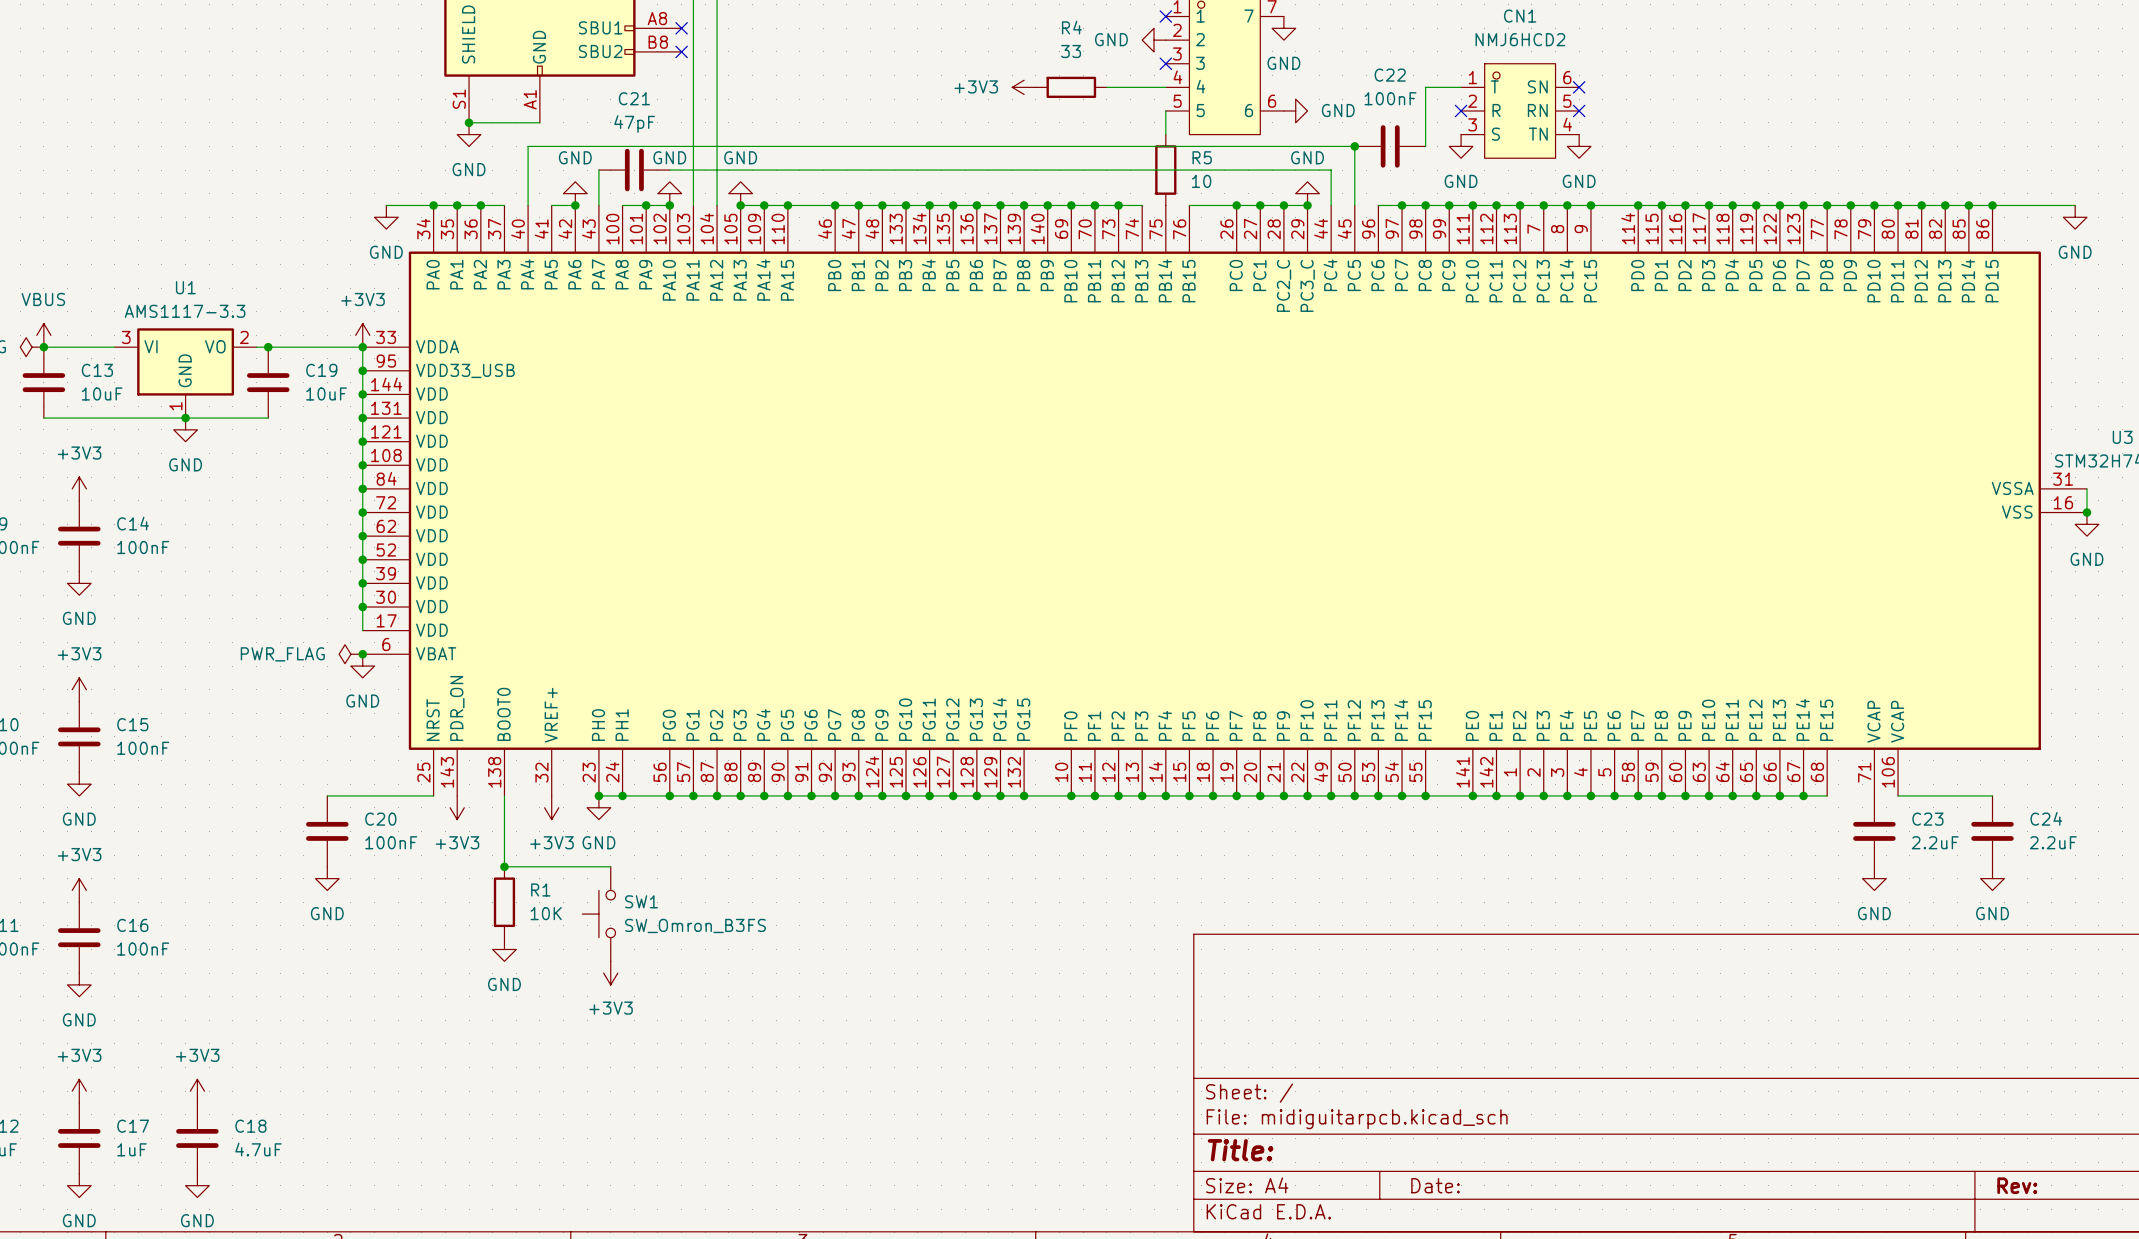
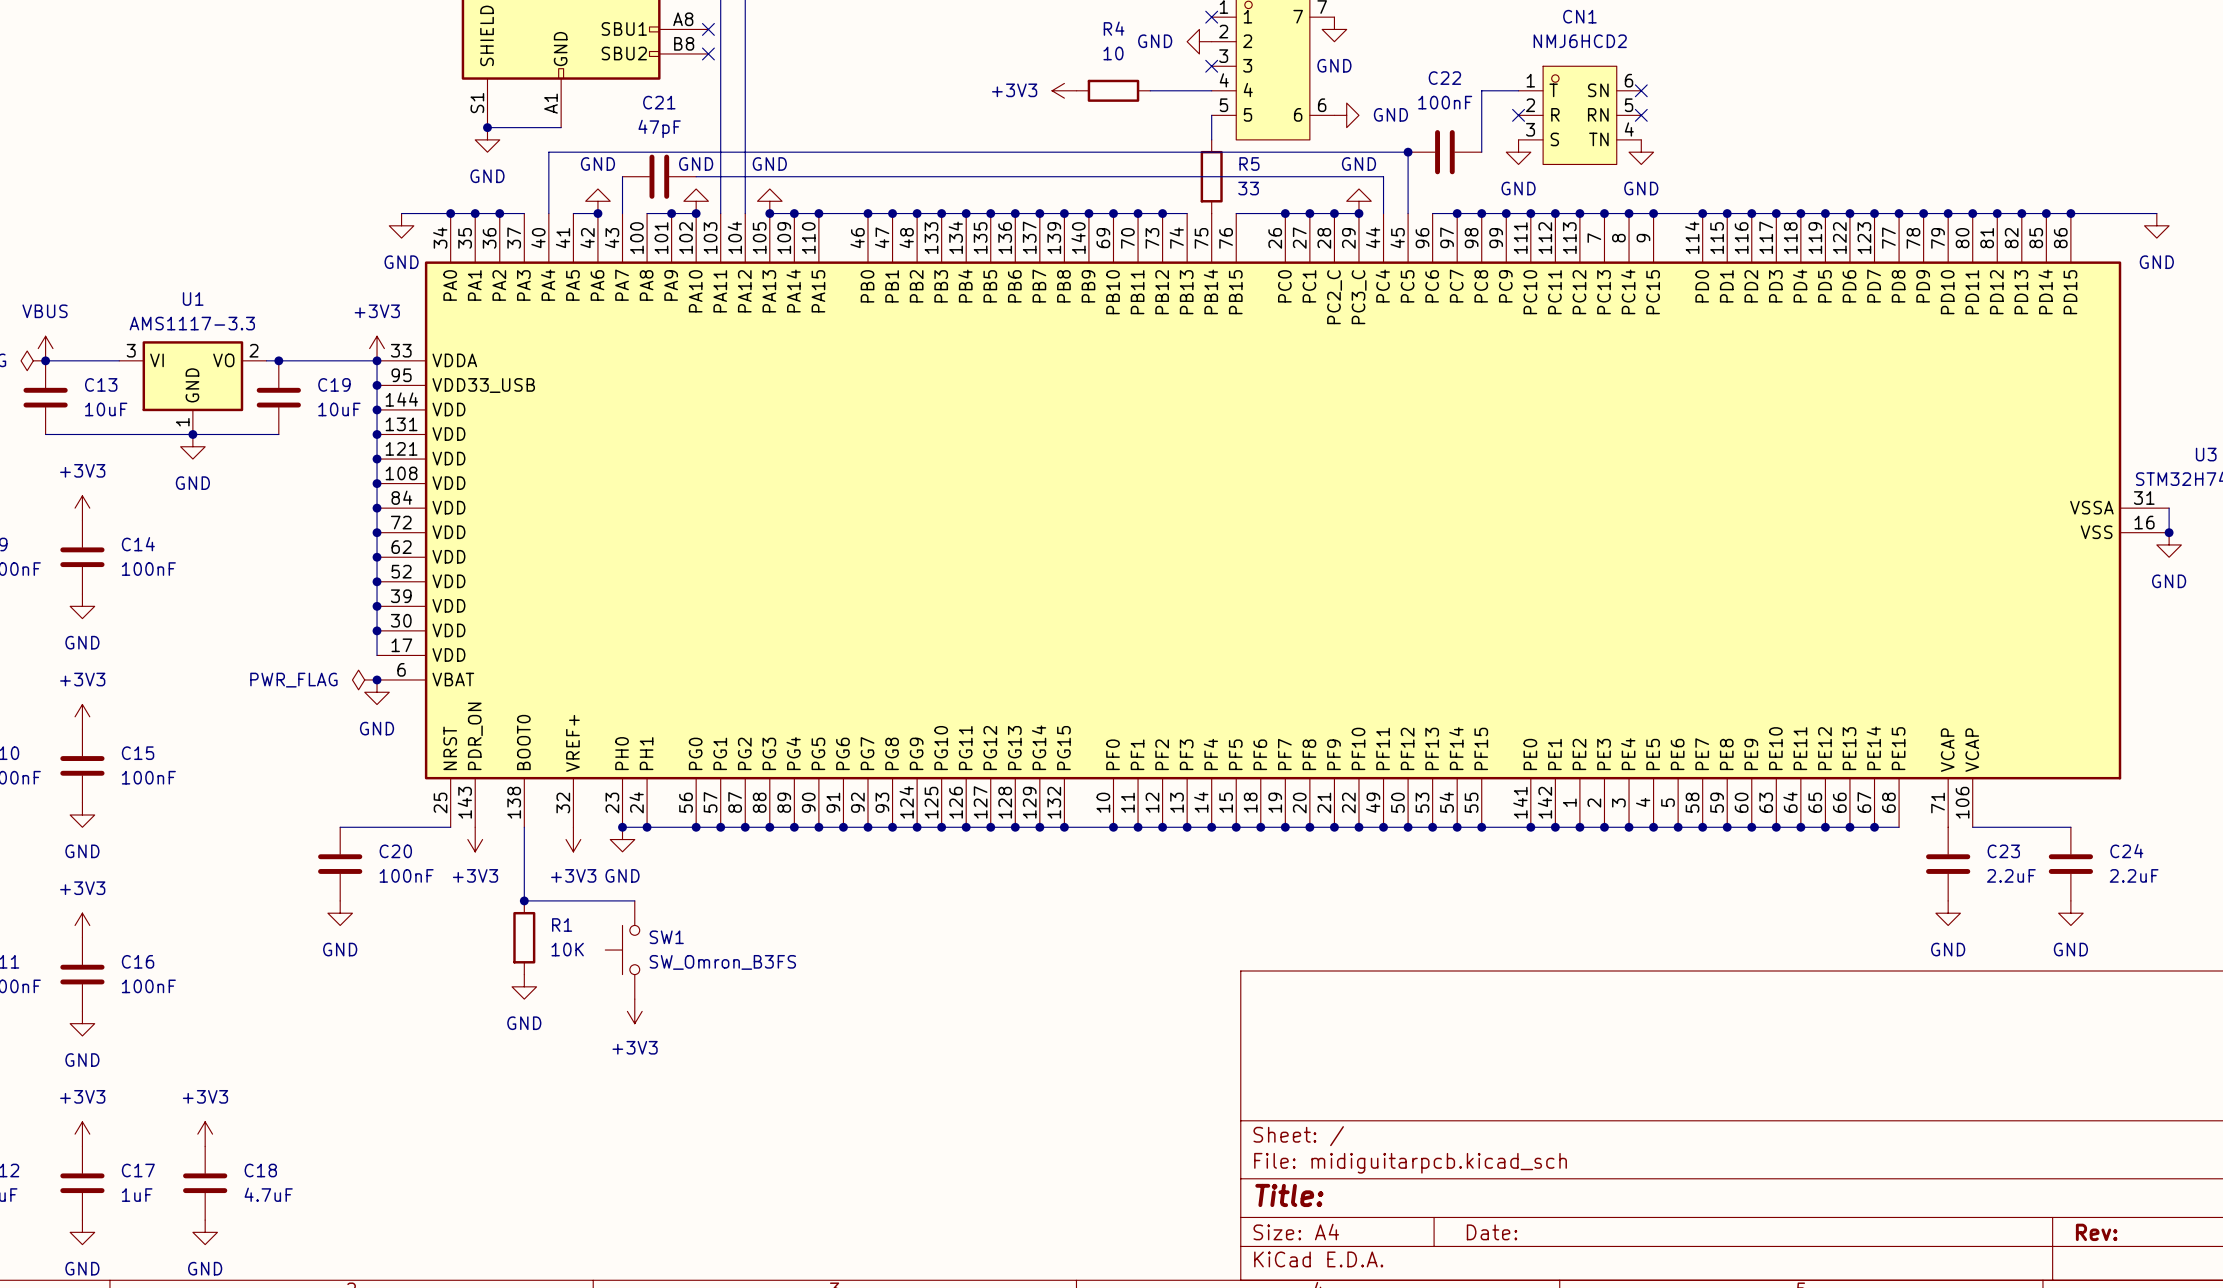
R4 value: 33 (1071, 51) -> 10 (1113, 53)
R5 value: 10 (1201, 181) -> 33 (1248, 188)

